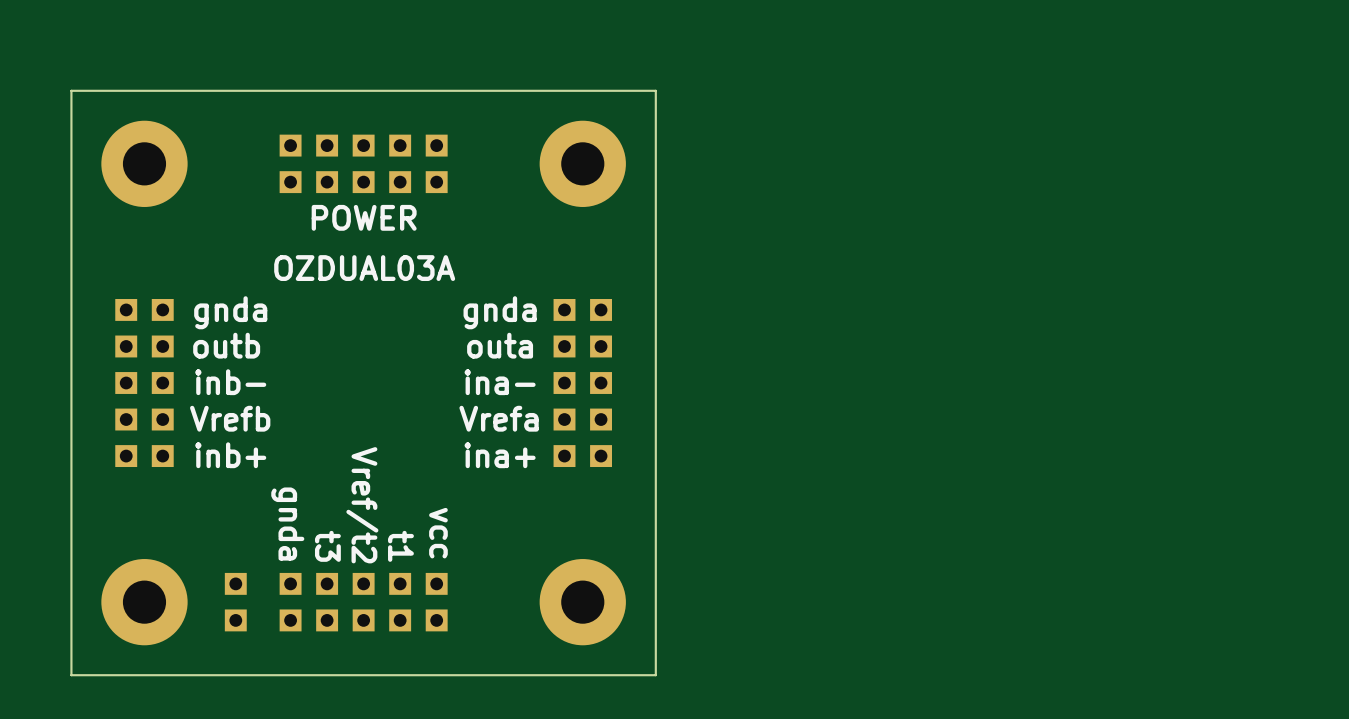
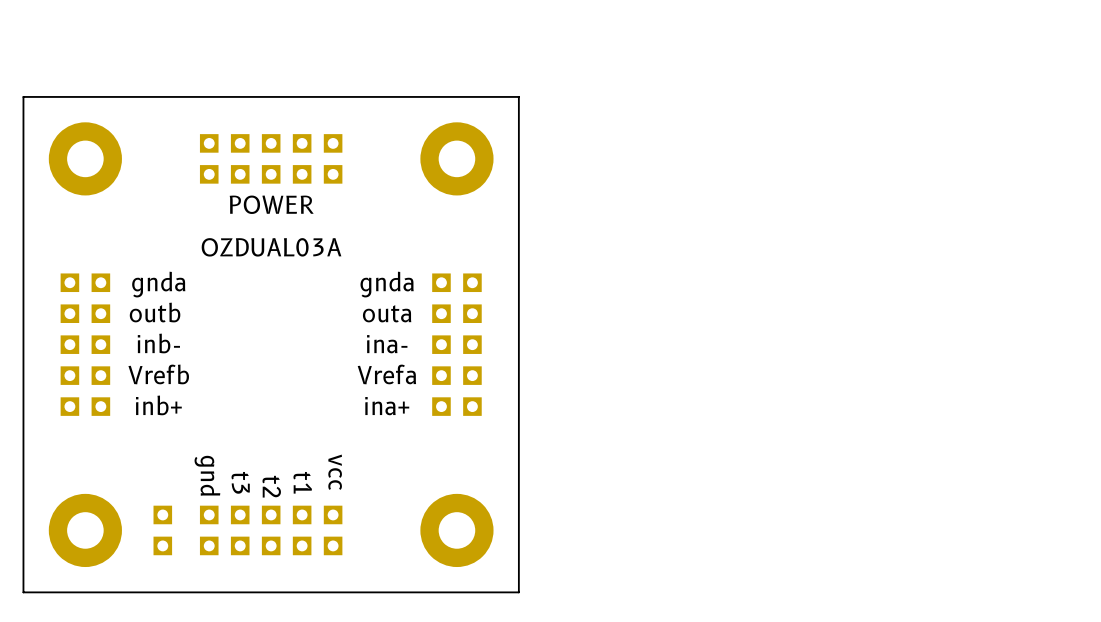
text: Vref/t2 (362, 505) -> none
text: gnda (287, 524) -> gnd (207, 475)
text: none -> t2 (271, 486)

